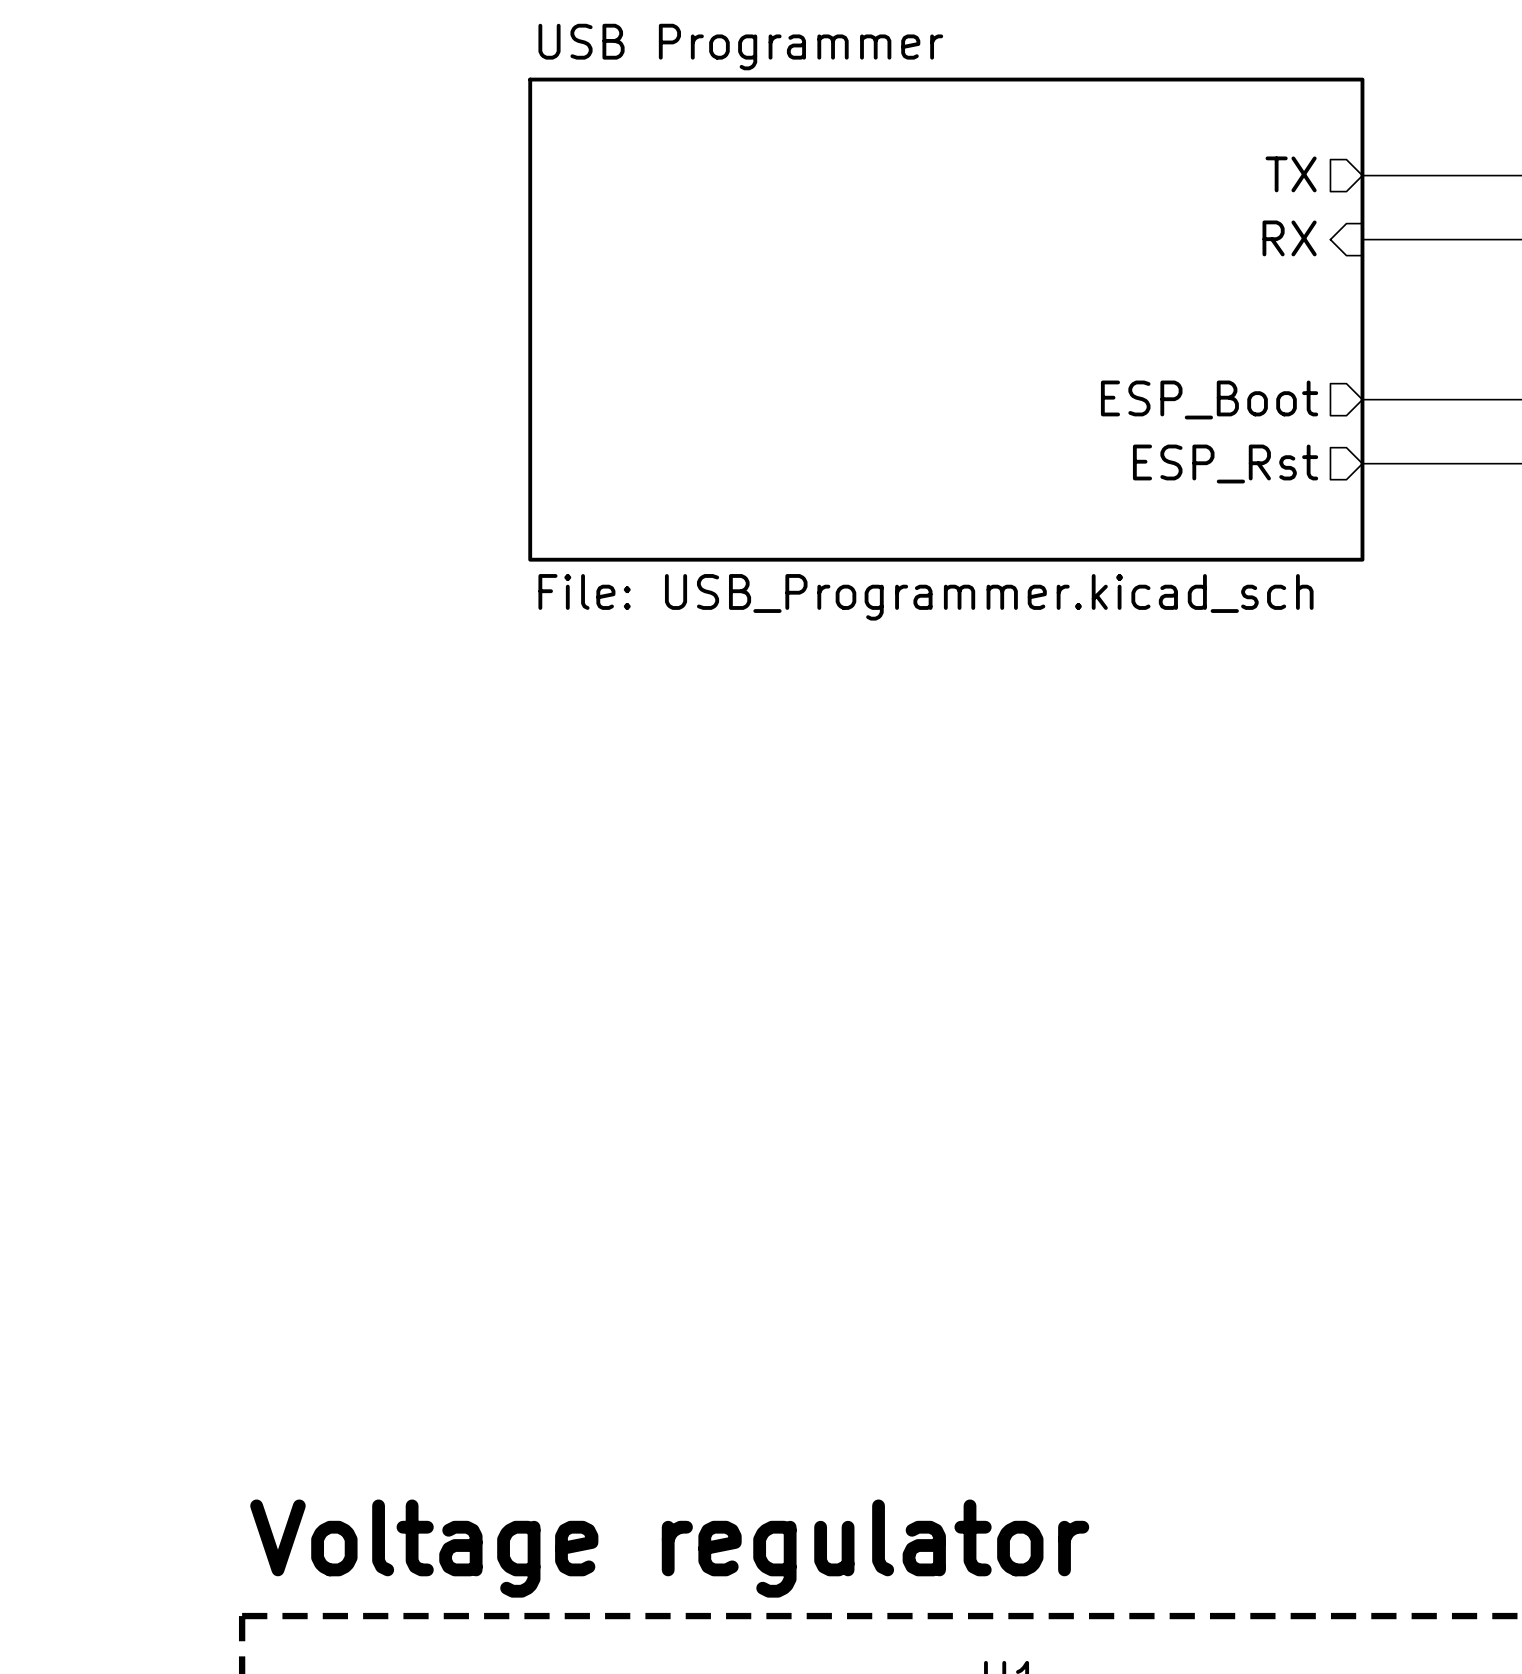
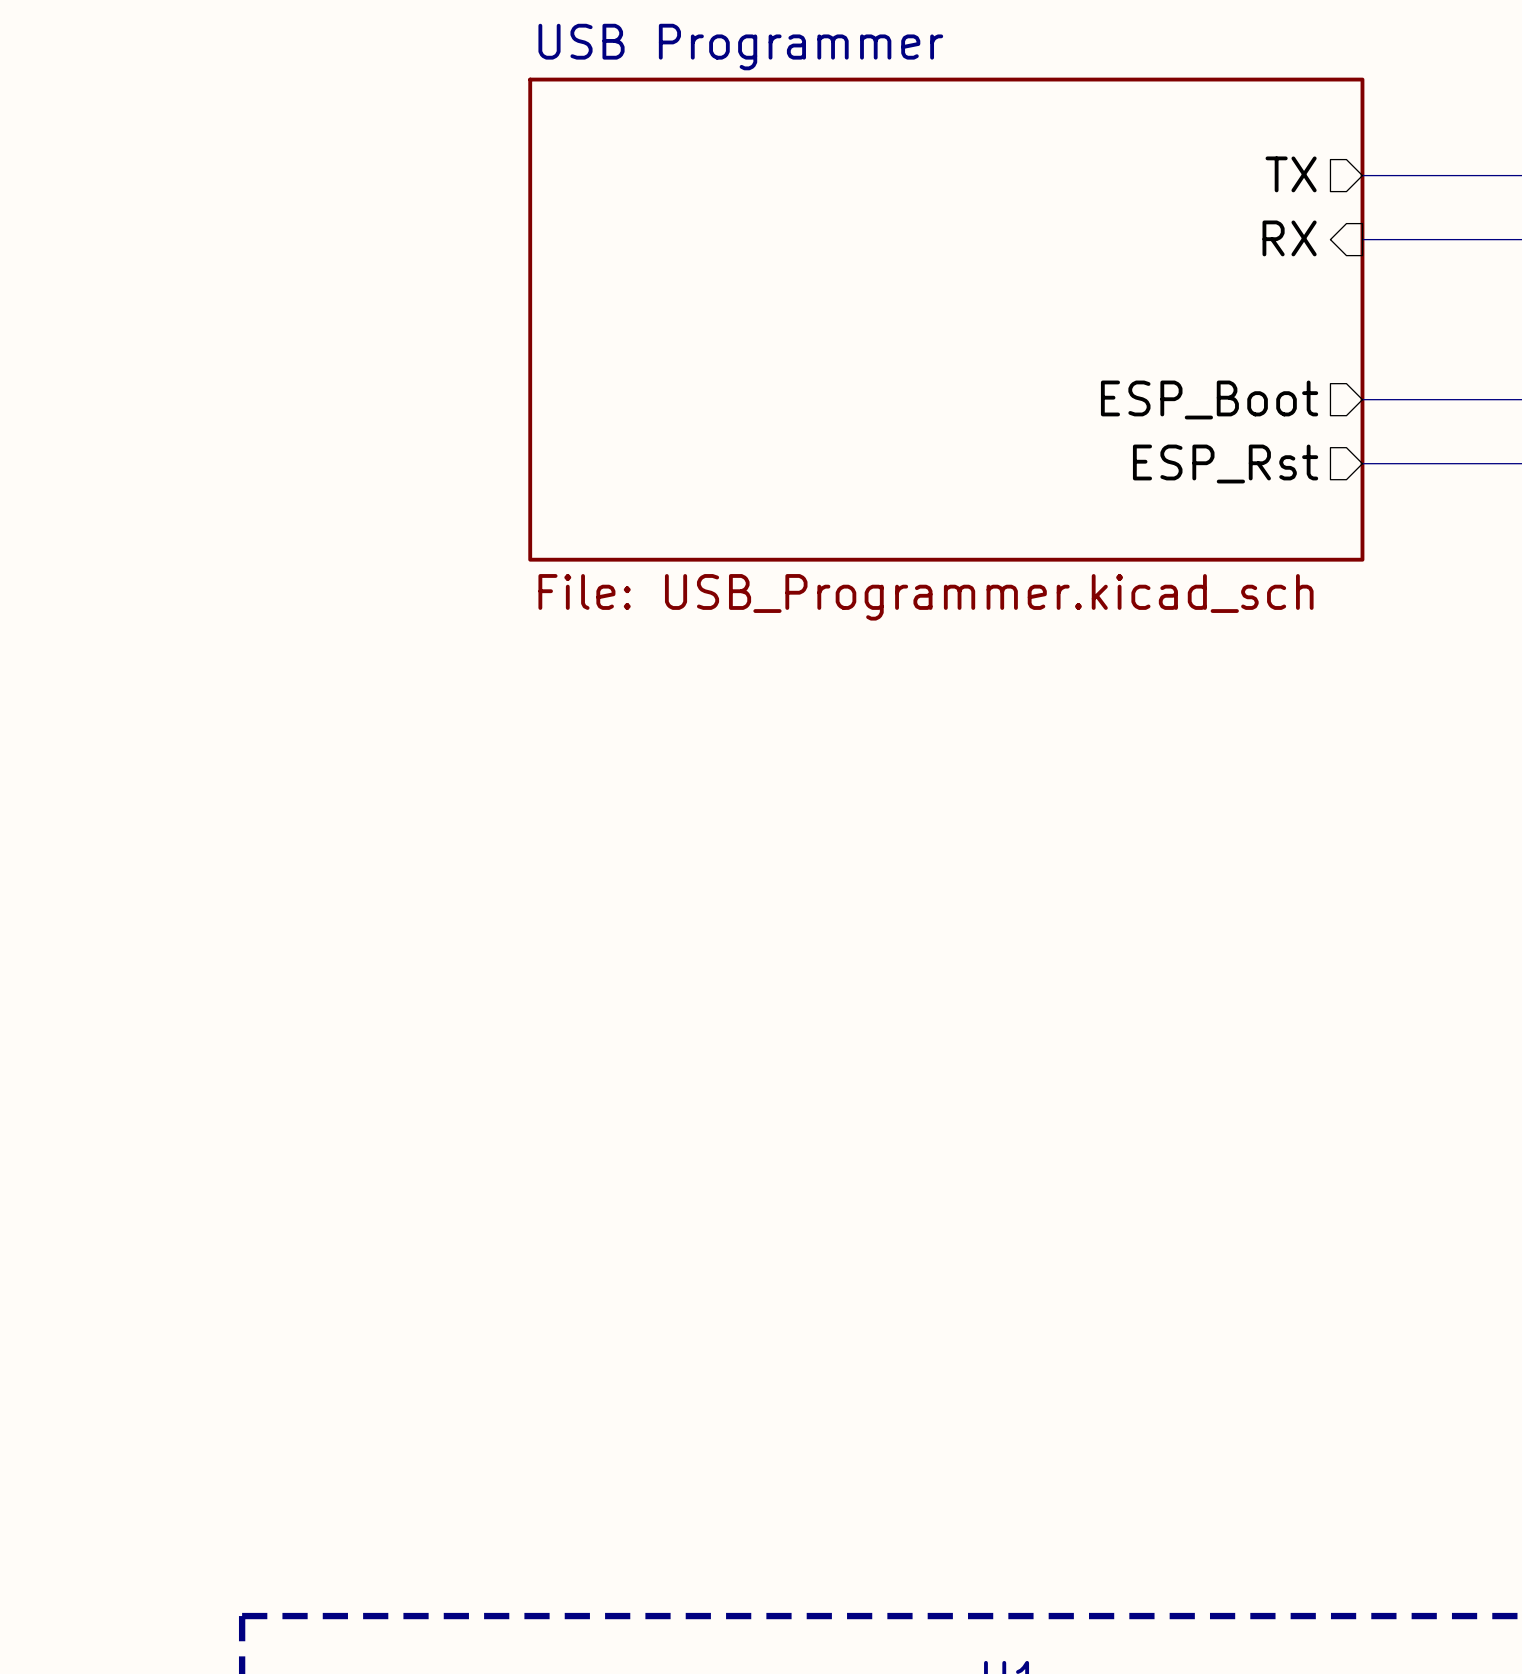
text: Voltage regulator (669, 1548) -> none

